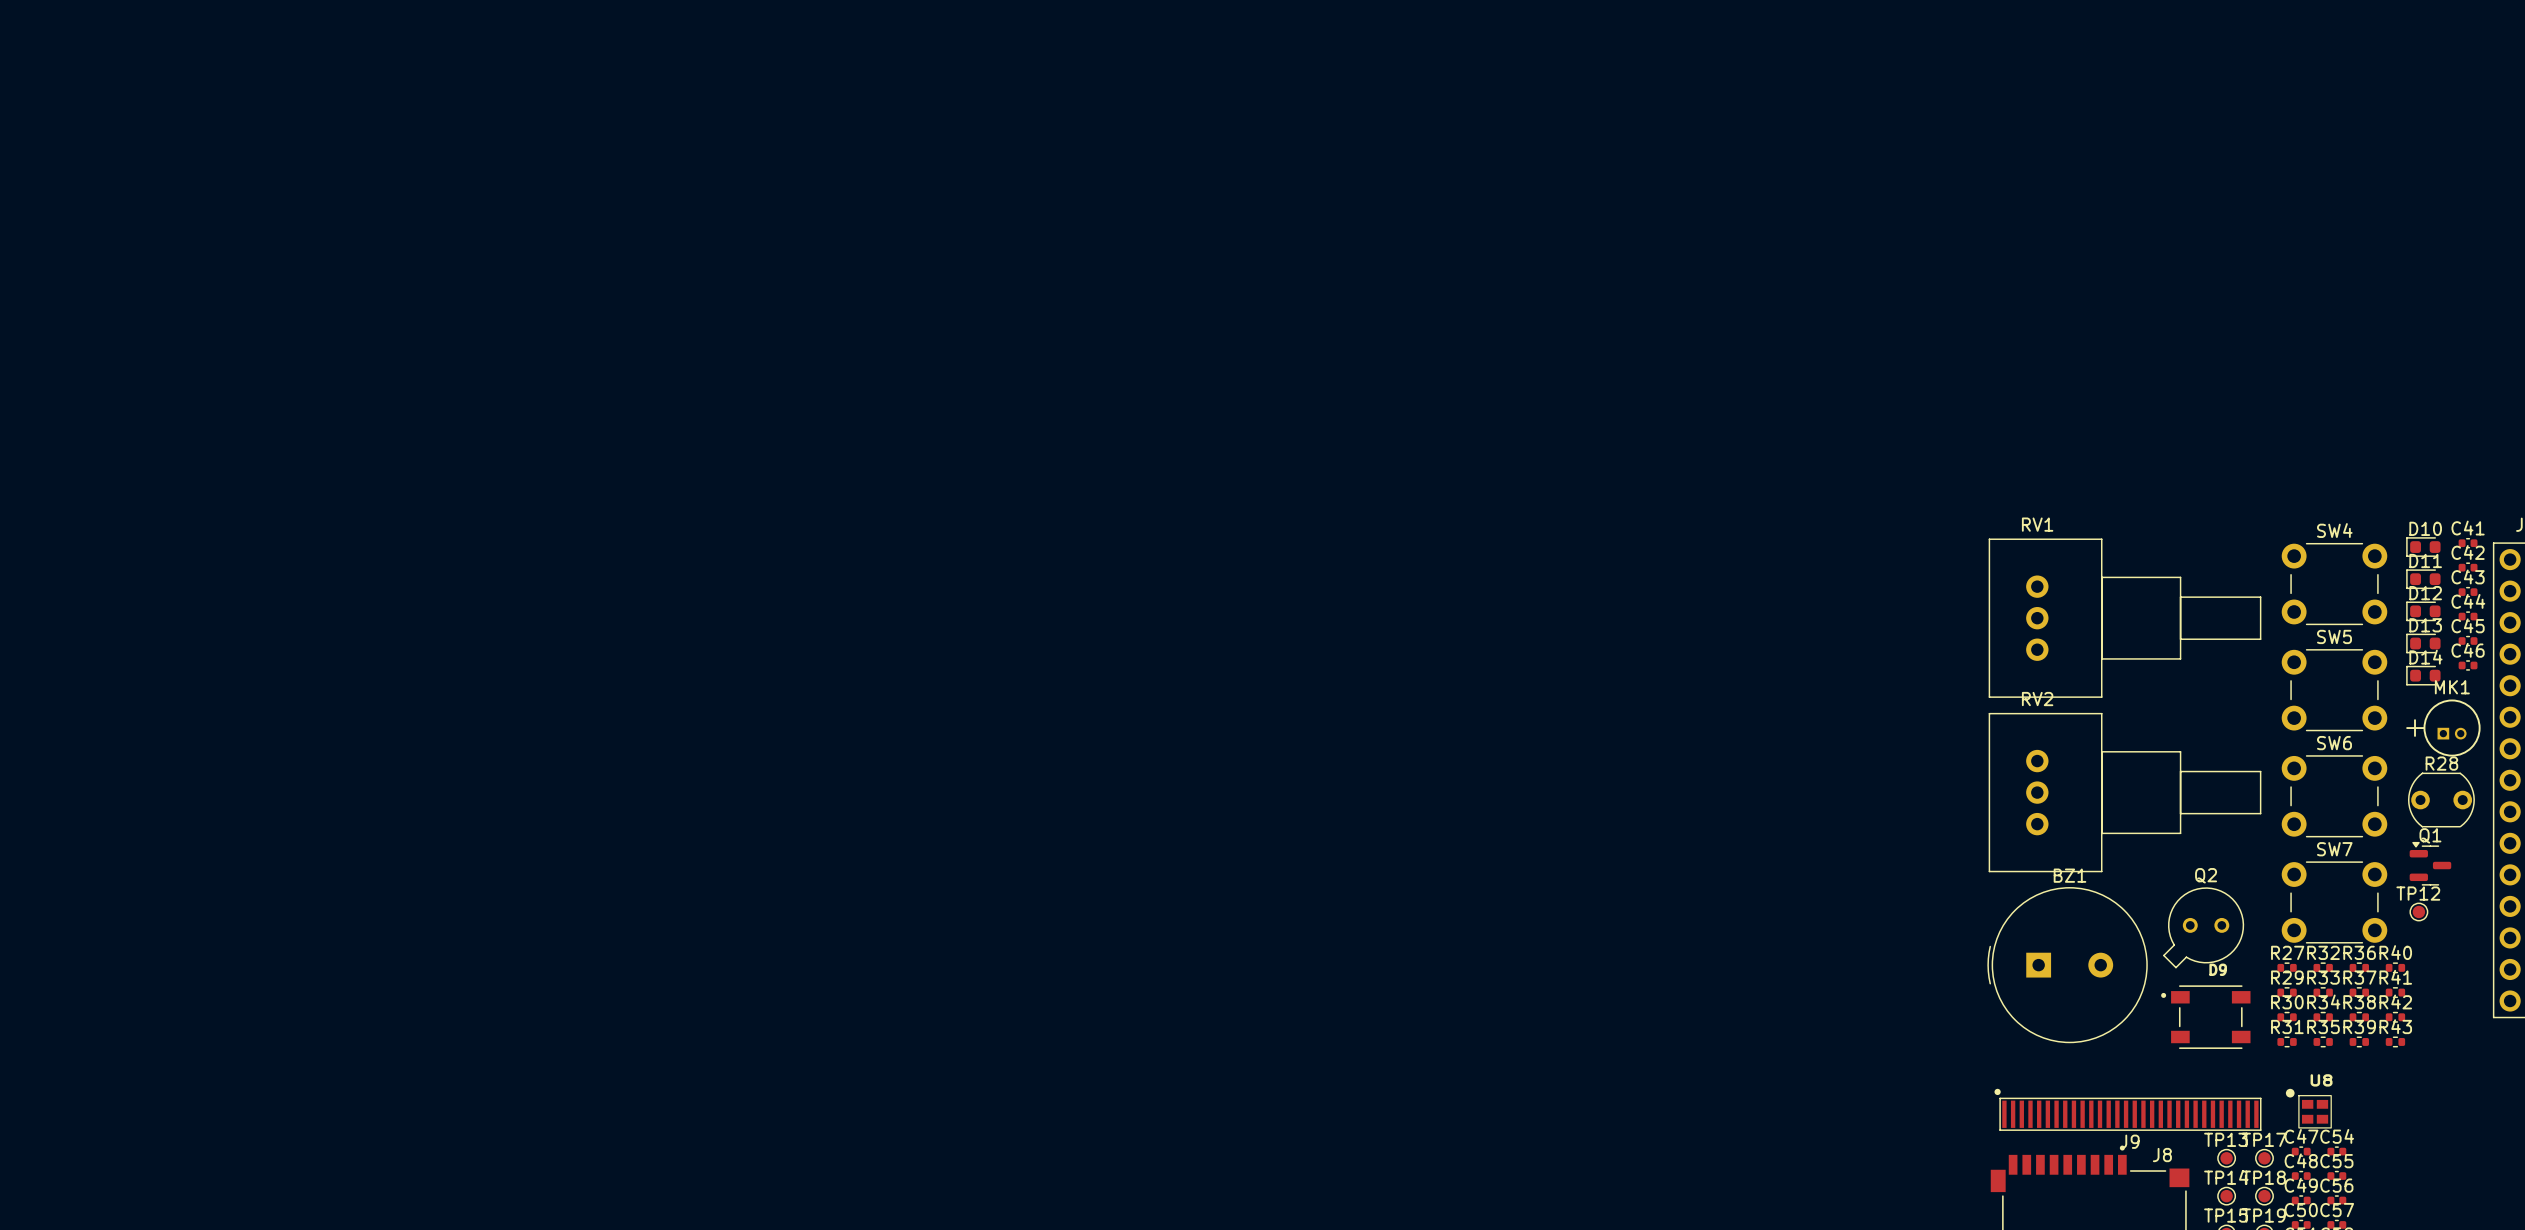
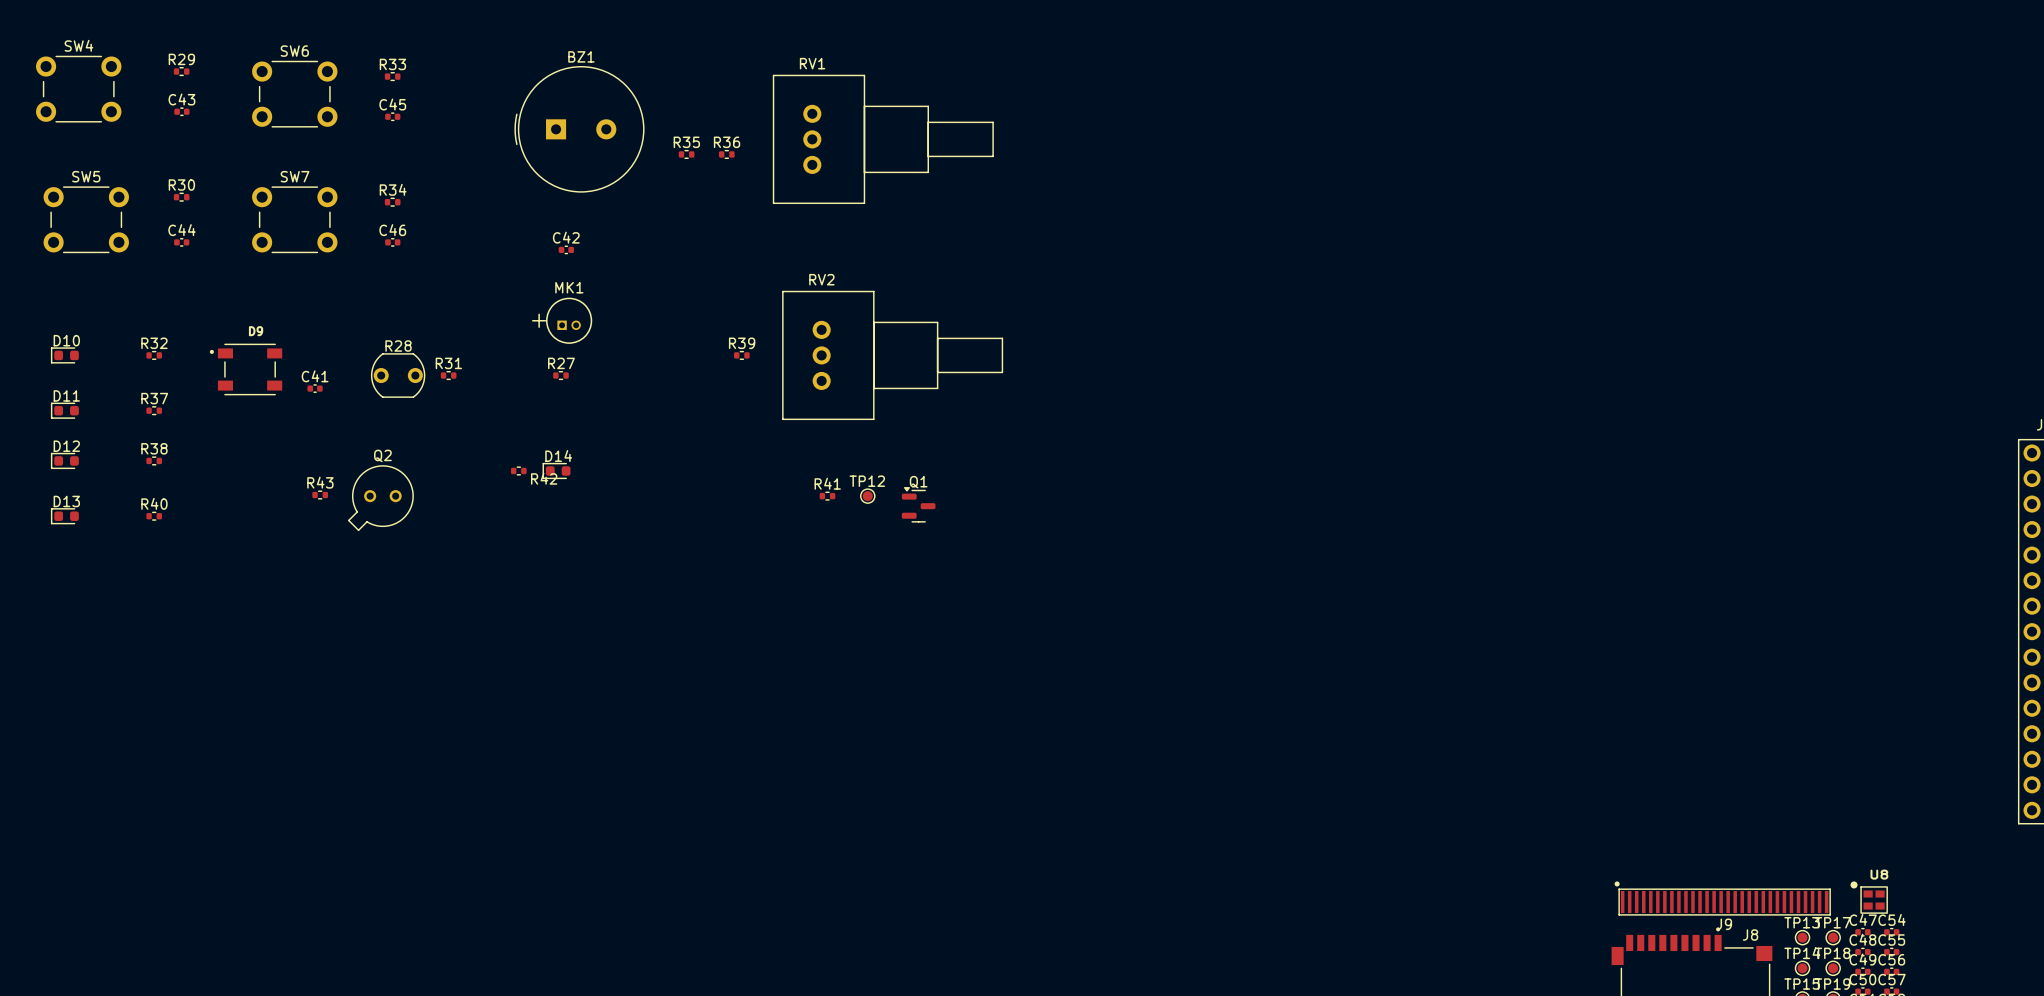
C41 position: (2468, 543) -> (315, 388)
D10 position: (2423, 547) -> (64, 355)
C42 position: (2468, 567) -> (566, 249)
D11 position: (2423, 579) -> (64, 410)
SW4 position: (2334, 584) -> (78, 89)
C43 position: (2468, 592) -> (181, 111)
D12 position: (2423, 611) -> (64, 460)
C44 position: (2468, 616) -> (181, 242)
RV1 position: (2125, 618) -> (883, 139)
C45 position: (2468, 641) -> (392, 116)
D13 position: (2423, 643) -> (64, 516)
C46 position: (2468, 665) -> (392, 242)
D14 position: (2423, 675) -> (556, 470)
SW5 position: (2334, 690) -> (86, 219)
MK1 position: (2443, 728) -> (562, 320)
RV2 position: (2125, 792) -> (892, 355)
SW6 position: (2334, 796) -> (294, 94)
R28 position: (2441, 799) -> (398, 375)
Q1 position: (2430, 863) -> (918, 504)
SW7 position: (2334, 902) -> (294, 219)
TP12 position: (2418, 912) -> (867, 496)
Q2 position: (2203, 927) -> (380, 498)
BZ1 position: (2067, 965) -> (579, 129)
R27 position: (2287, 967) -> (560, 375)
R32 position: (2323, 967) -> (154, 355)
R36 position: (2359, 967) -> (726, 154)
R40 position: (2395, 967) -> (154, 516)
R29 position: (2287, 992) -> (181, 71)
R33 position: (2323, 992) -> (392, 76)
R37 position: (2359, 992) -> (154, 410)
R41 position: (2395, 992) -> (827, 496)
R42 name position: R42 (2395, 1001) -> R42 (544, 478)
D9 position: (2205, 1017) -> (246, 369)
R30 position: (2287, 1017) -> (181, 197)
R34 position: (2323, 1017) -> (392, 202)
R38 position: (2359, 1017) -> (154, 460)
R42 position: (2395, 1017) -> (518, 470)
R31 position: (2287, 1041) -> (448, 375)
R35 position: (2323, 1041) -> (686, 154)
R39 position: (2359, 1041) -> (741, 355)
R43 position: (2395, 1041) -> (320, 495)

